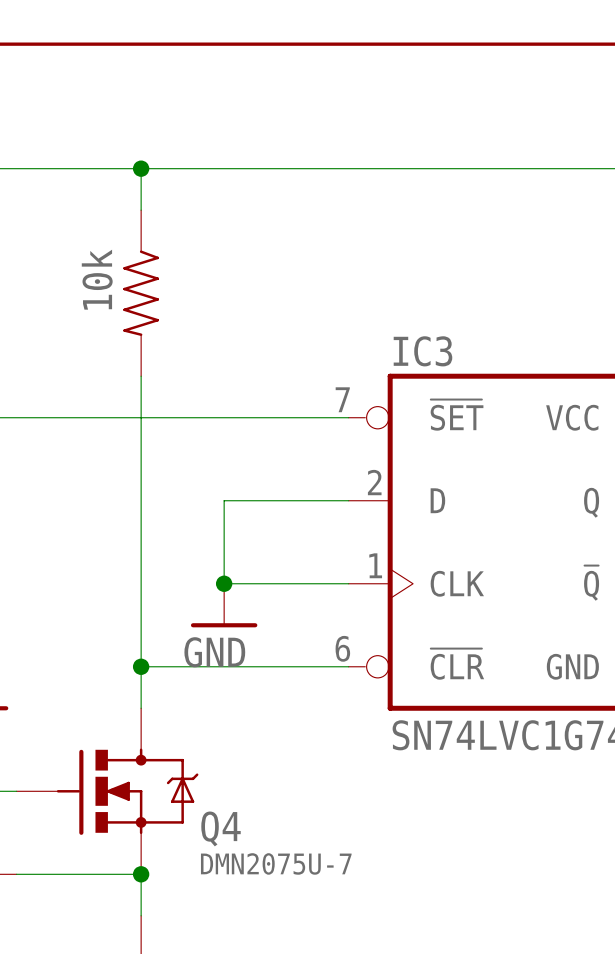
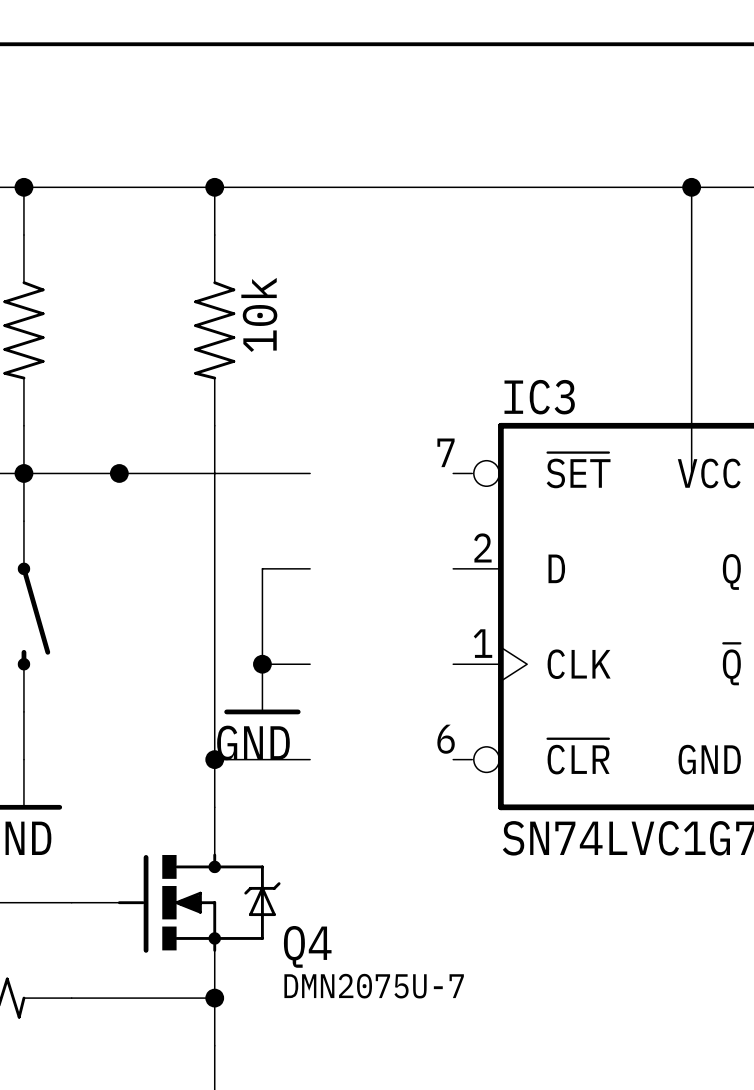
wire: none -> (691, 187) (691, 473)
junction: none -> (691, 187)
part value position: 10k (97, 279) -> 10k (259, 314)
junction: none -> (119, 473)
wire: (224, 417) (348, 417) -> none
wire: none -> (310, 568) (262, 568) (262, 664) (310, 664)
wire: (348, 500) (224, 500) (224, 583) (348, 583) -> none
junction position: (224, 583) -> (262, 664)
power symbol position: GND (224, 605) -> GND (262, 689)
wire: (224, 666) (348, 666) -> none

